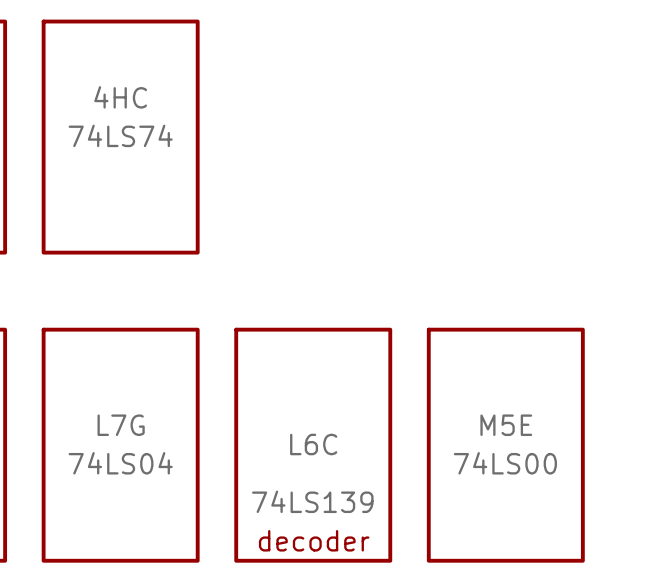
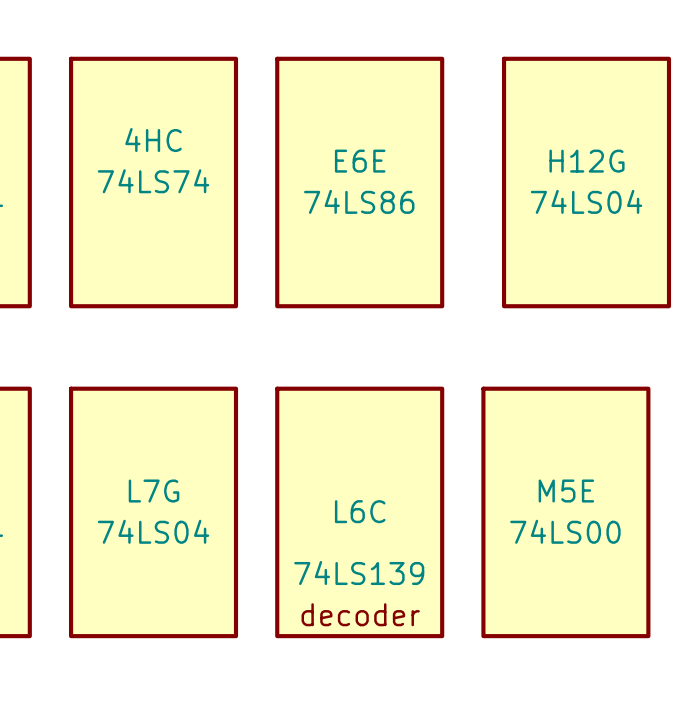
E6E: none -> 74LS86 (359, 182)
H12G: none -> 74LS04 (586, 182)

